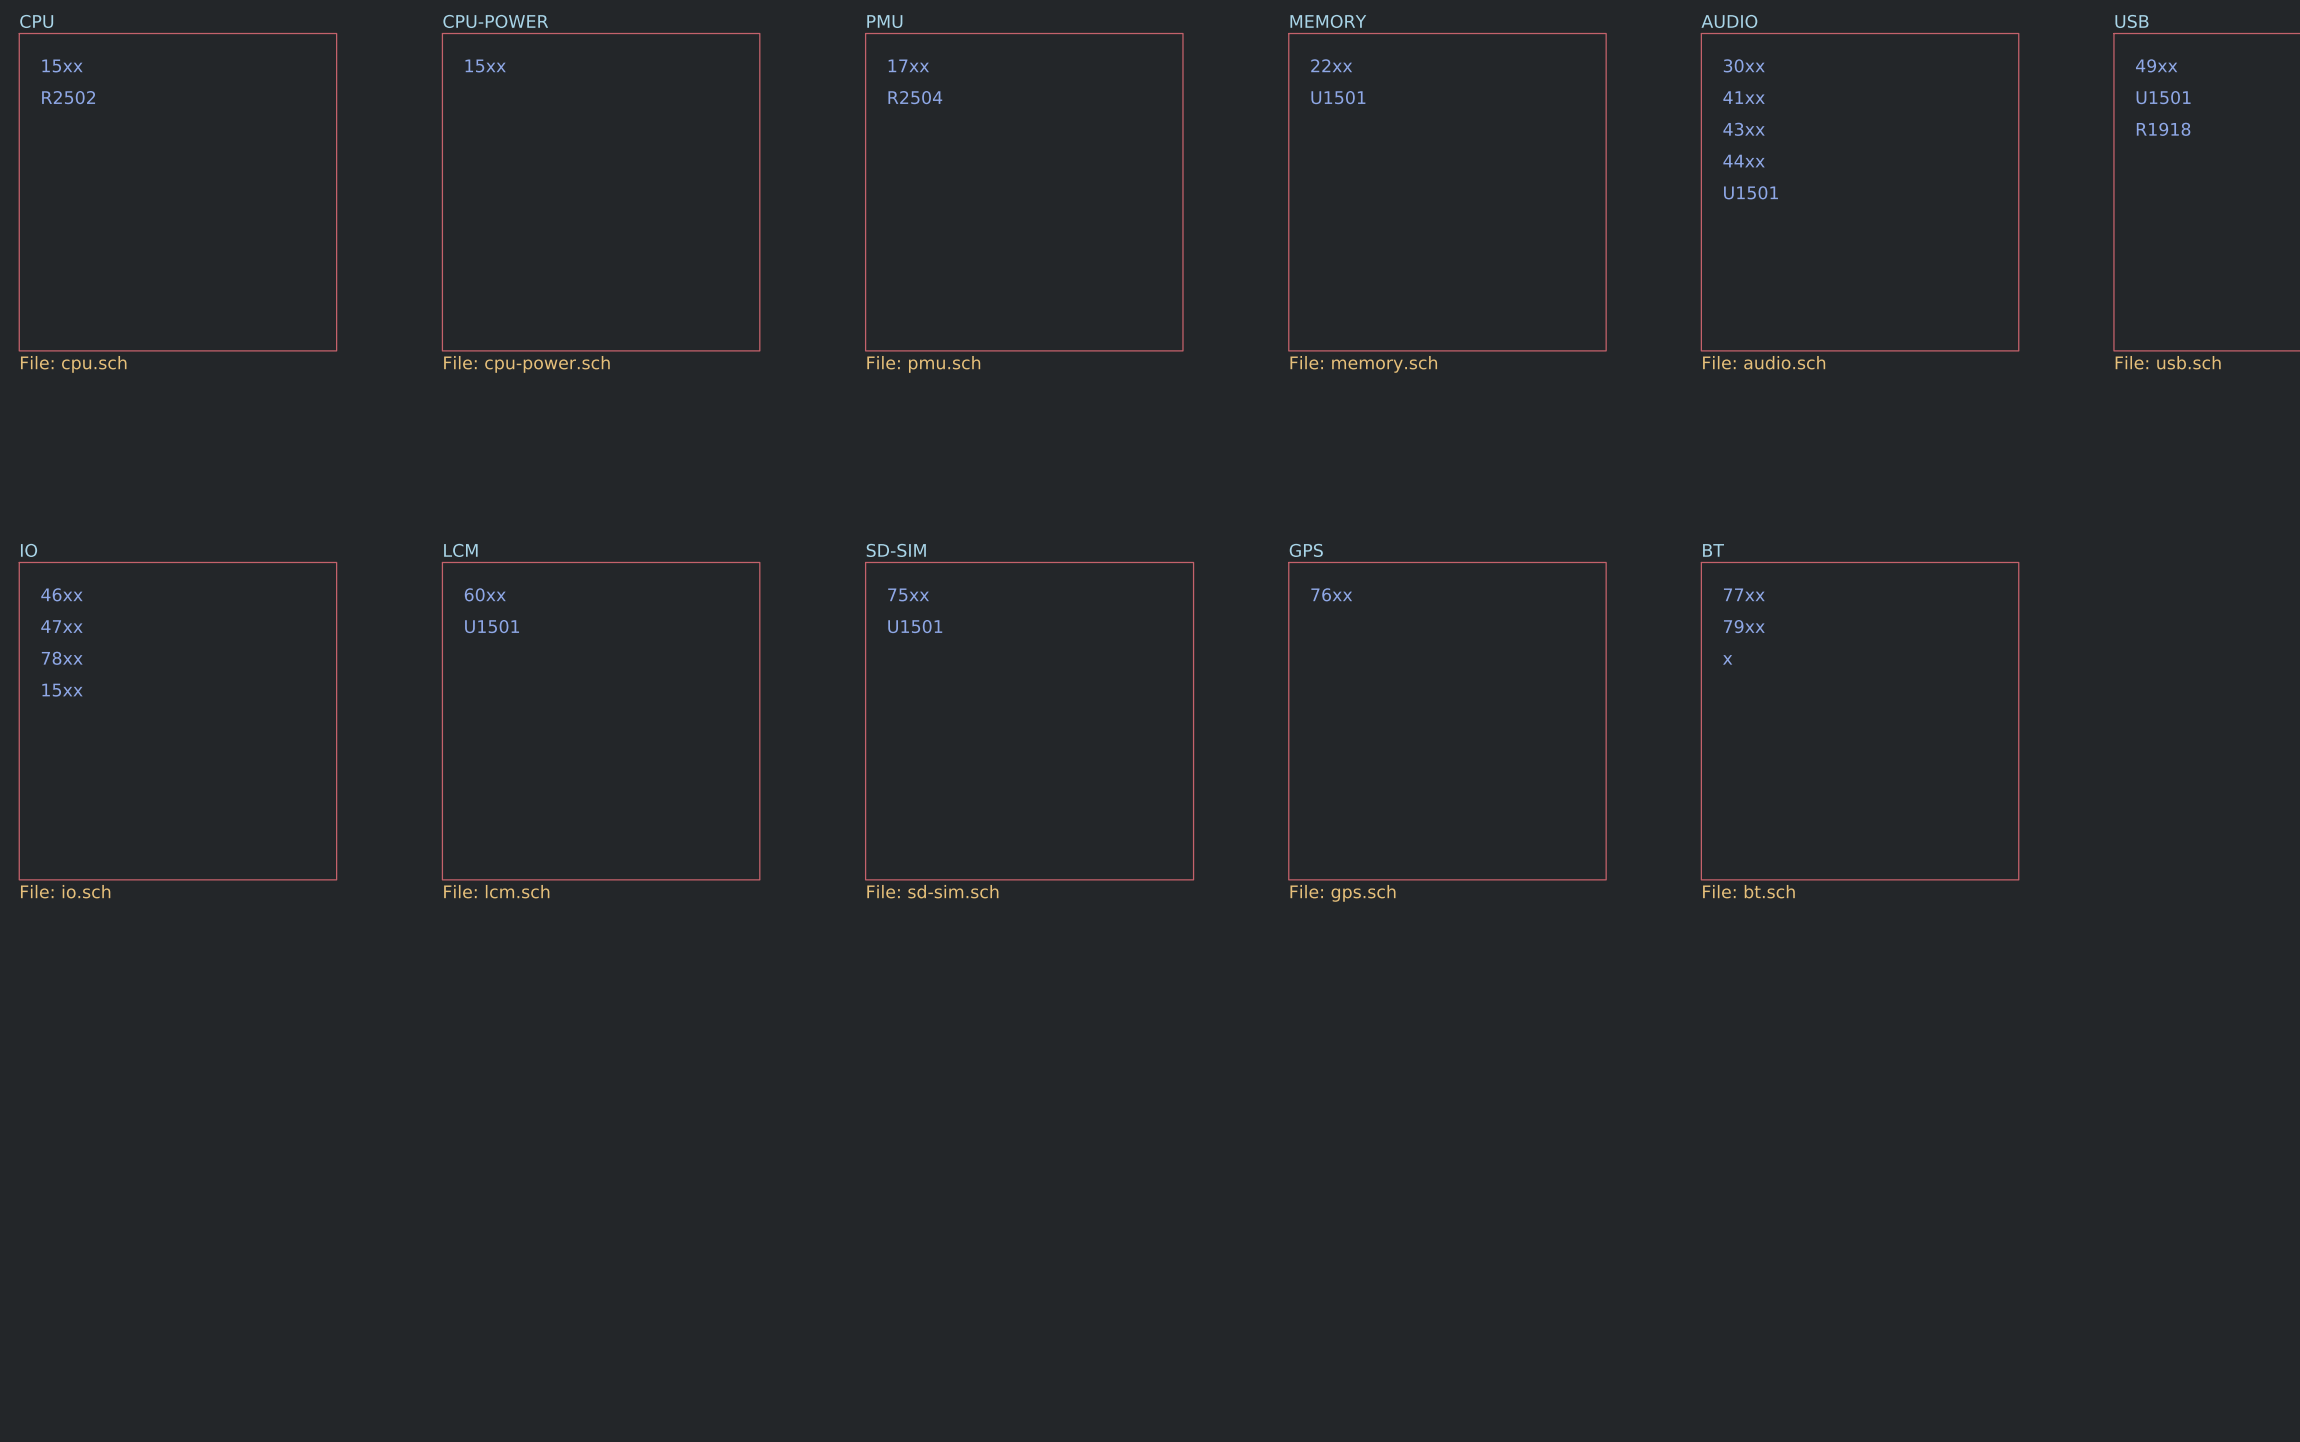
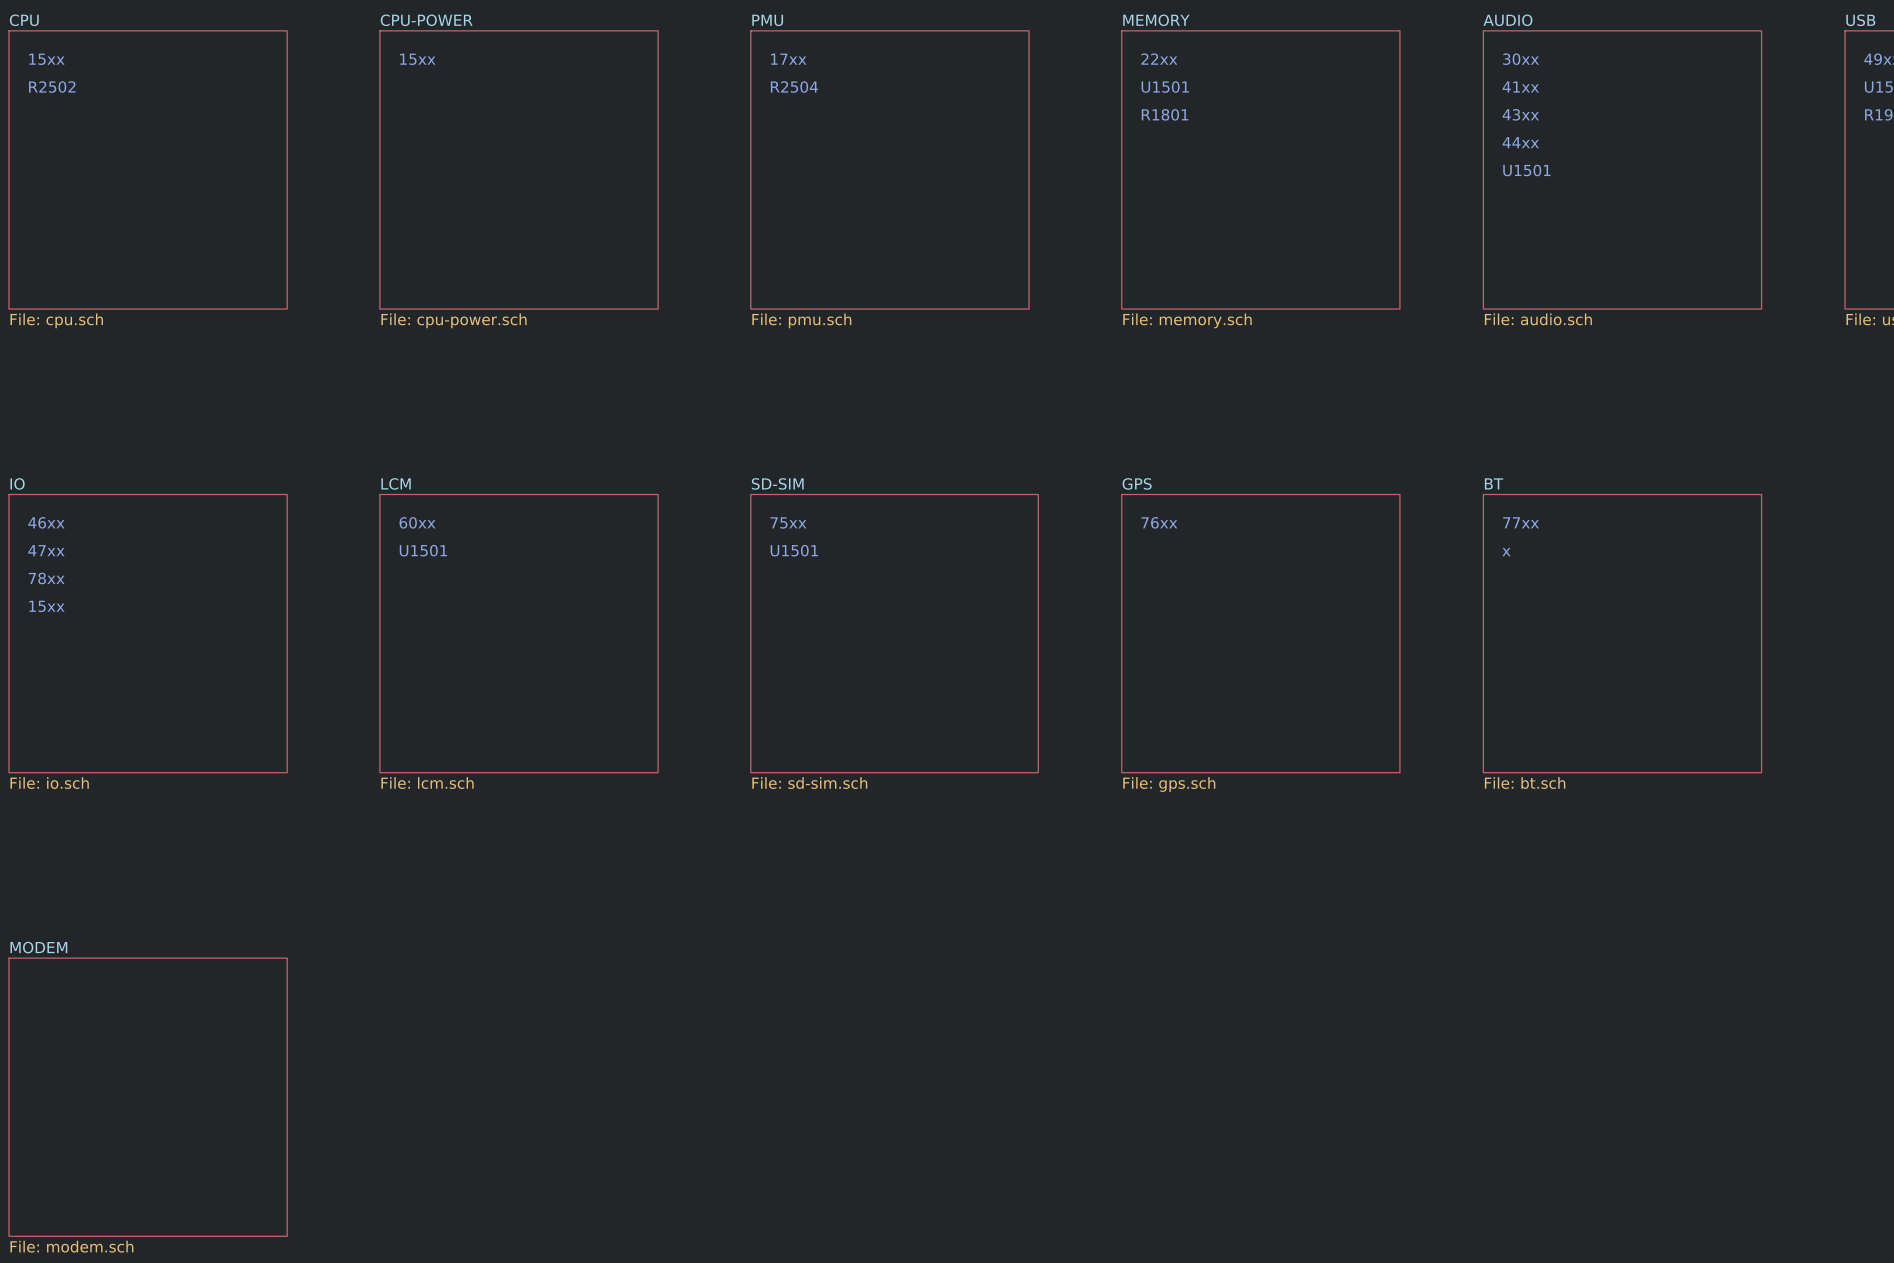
text: none -> R1801 (1165, 114)
text: 79xx (1744, 626) -> x (1506, 552)
text: x (1727, 659) -> none
sheet MODEM: none -> File: modem.sch (148, 1097)

